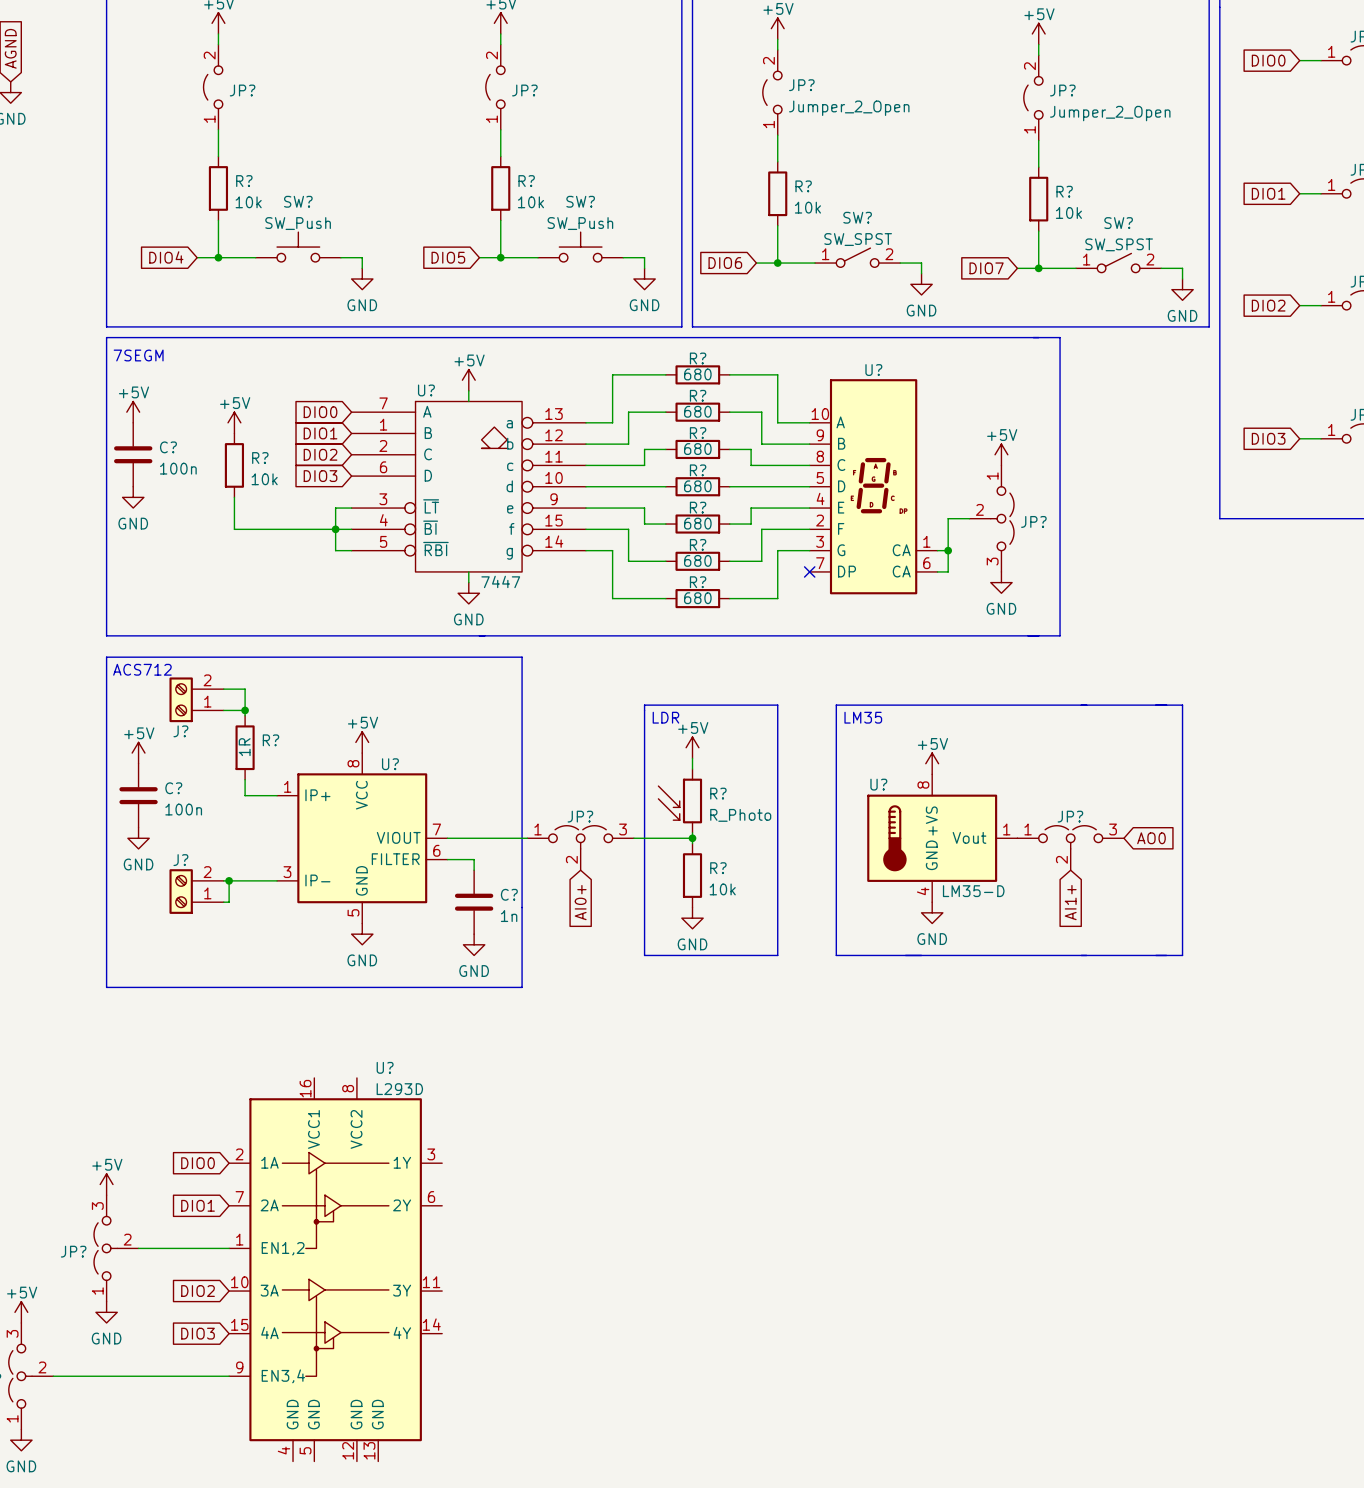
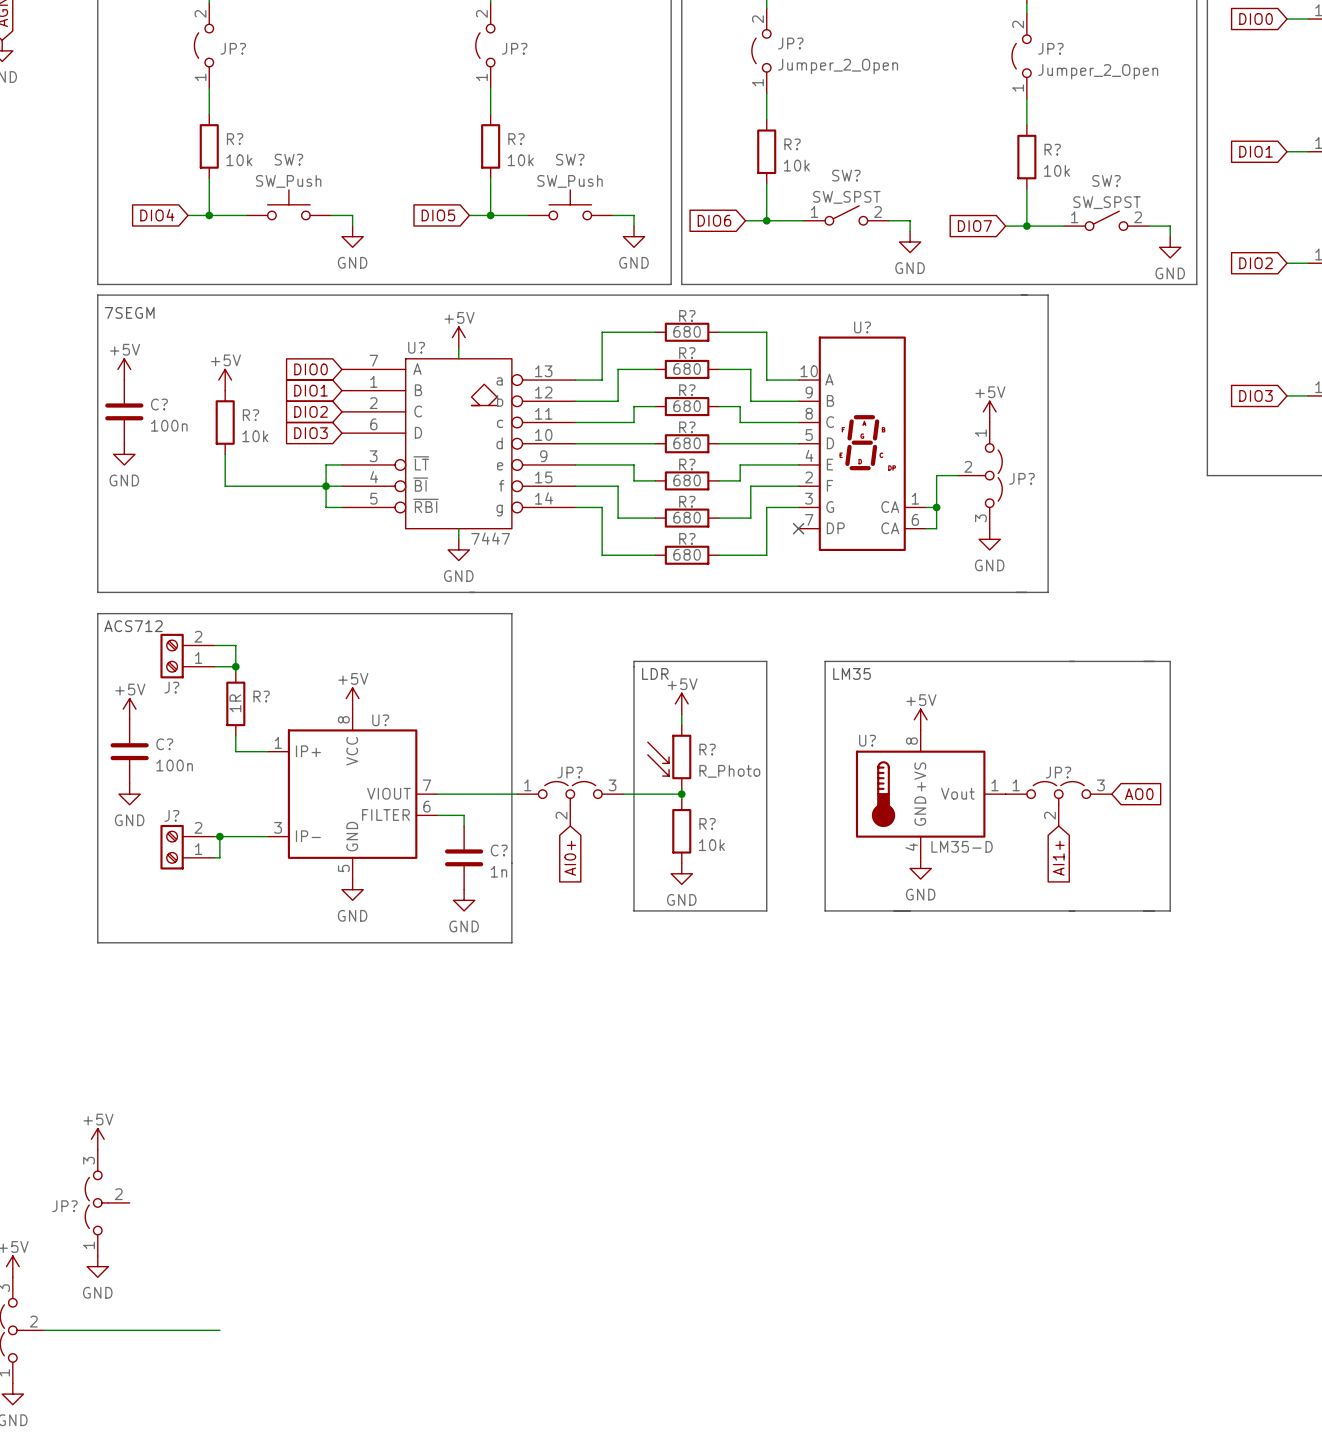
global label: DIO0 (198, 1163) -> none
global label: DIO1 (198, 1205) -> none
wire: (138, 1248) (229, 1248) -> none
U?: L293D (335, 1269) -> none
global label: DIO2 (198, 1291) -> none
global label: DIO3 (198, 1333) -> none

